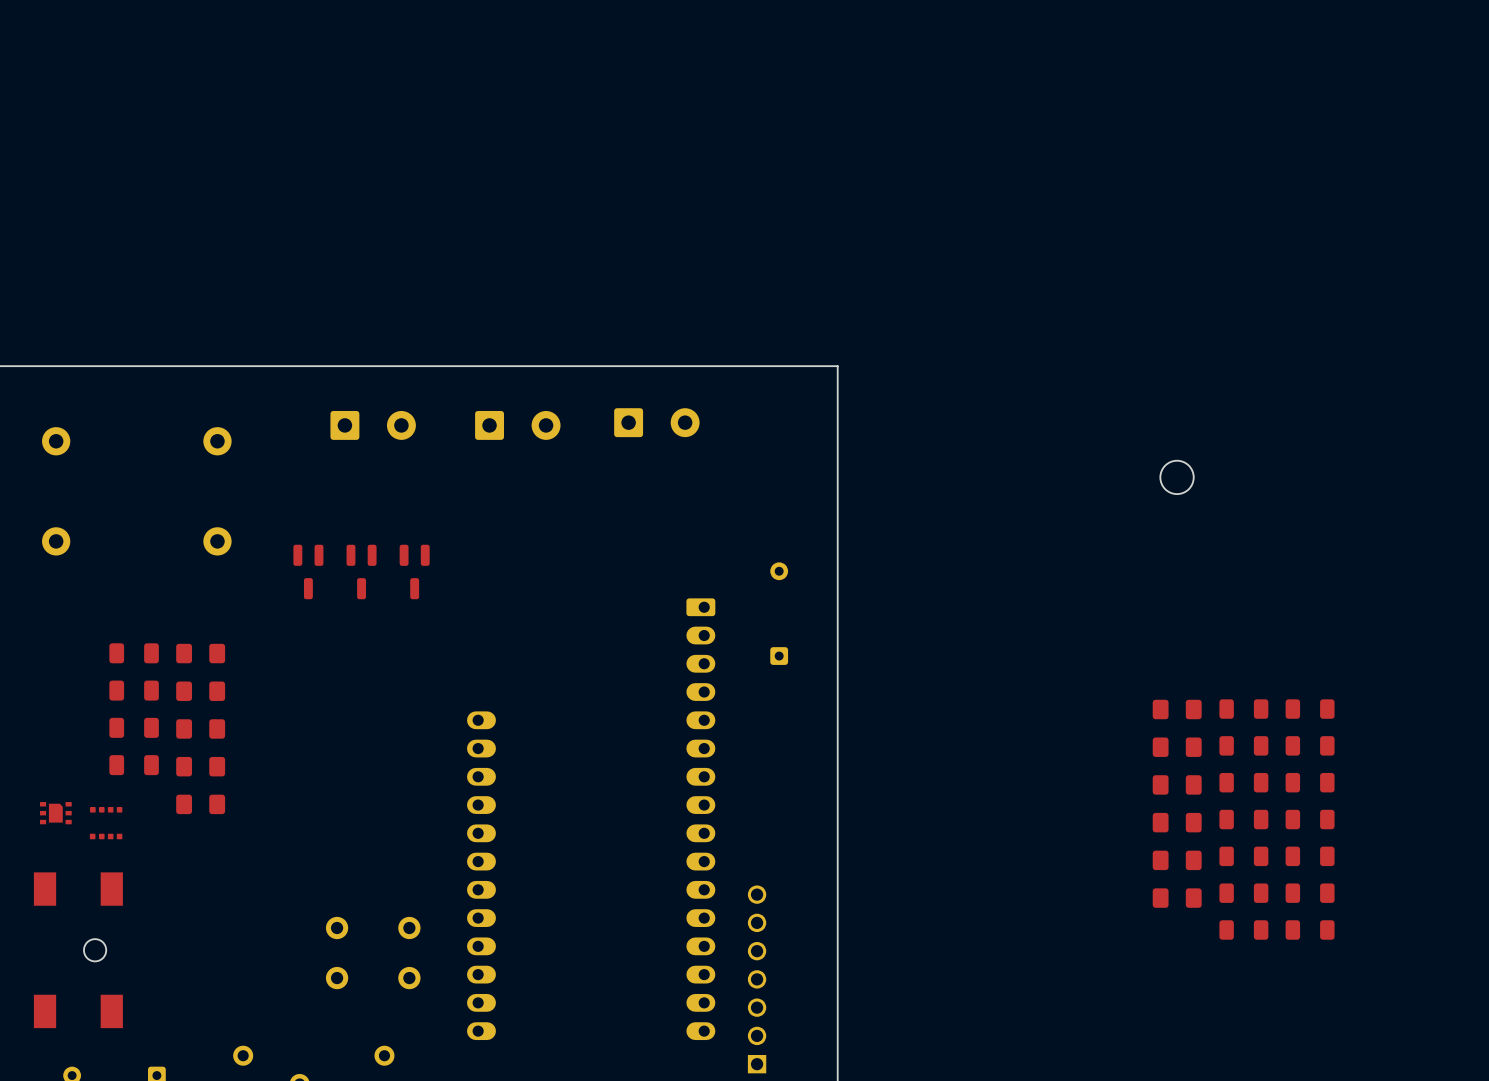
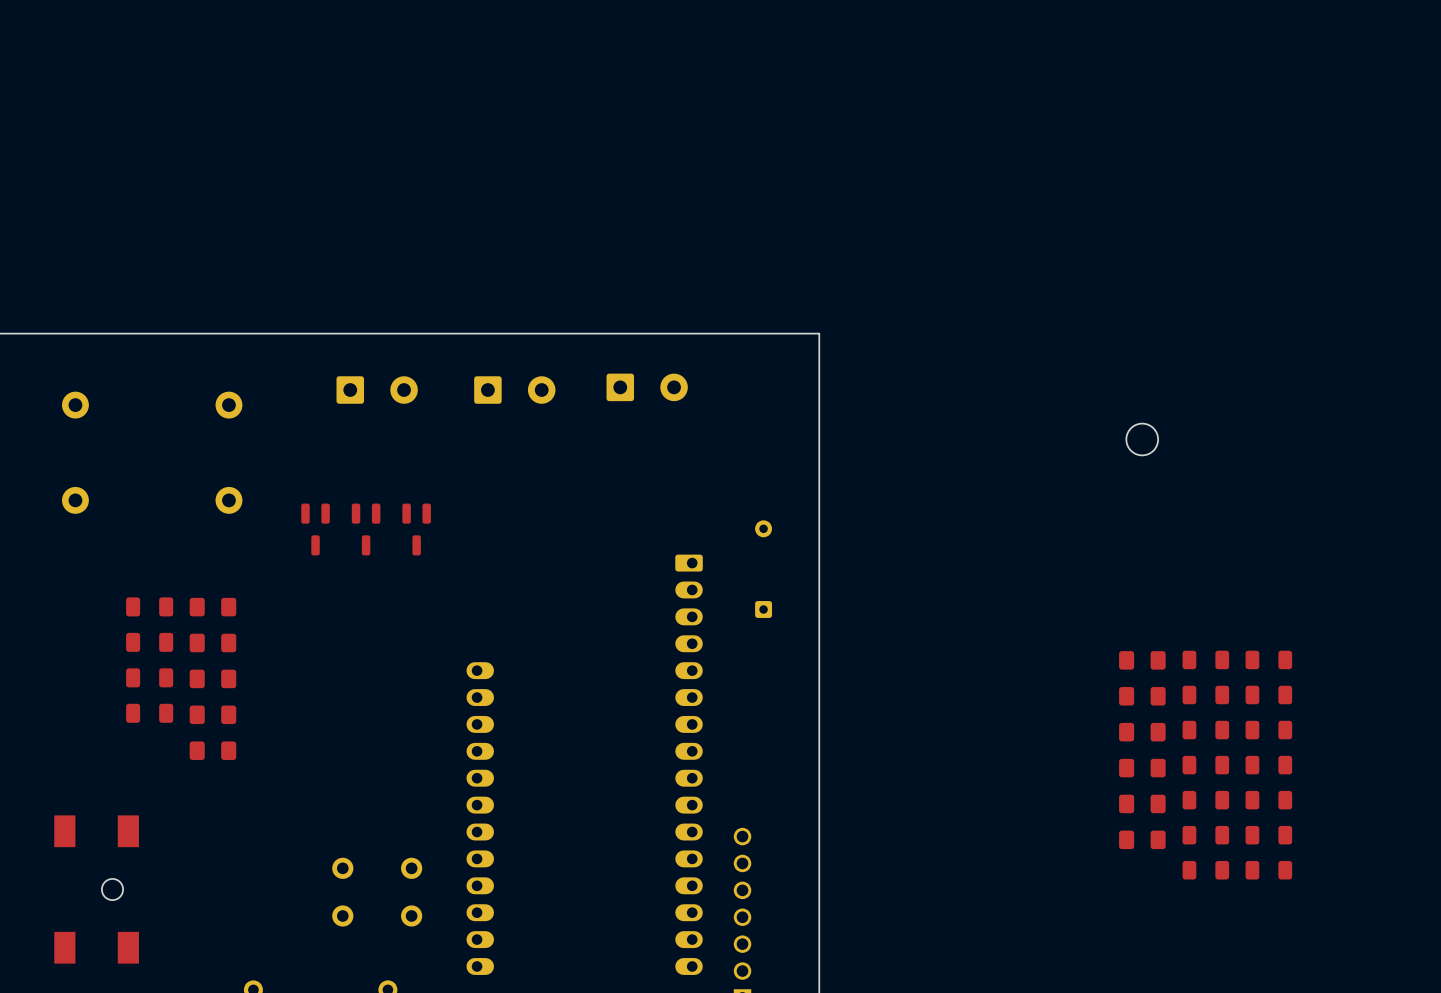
part: (55, 813) -> none
part: (106, 823) -> none

